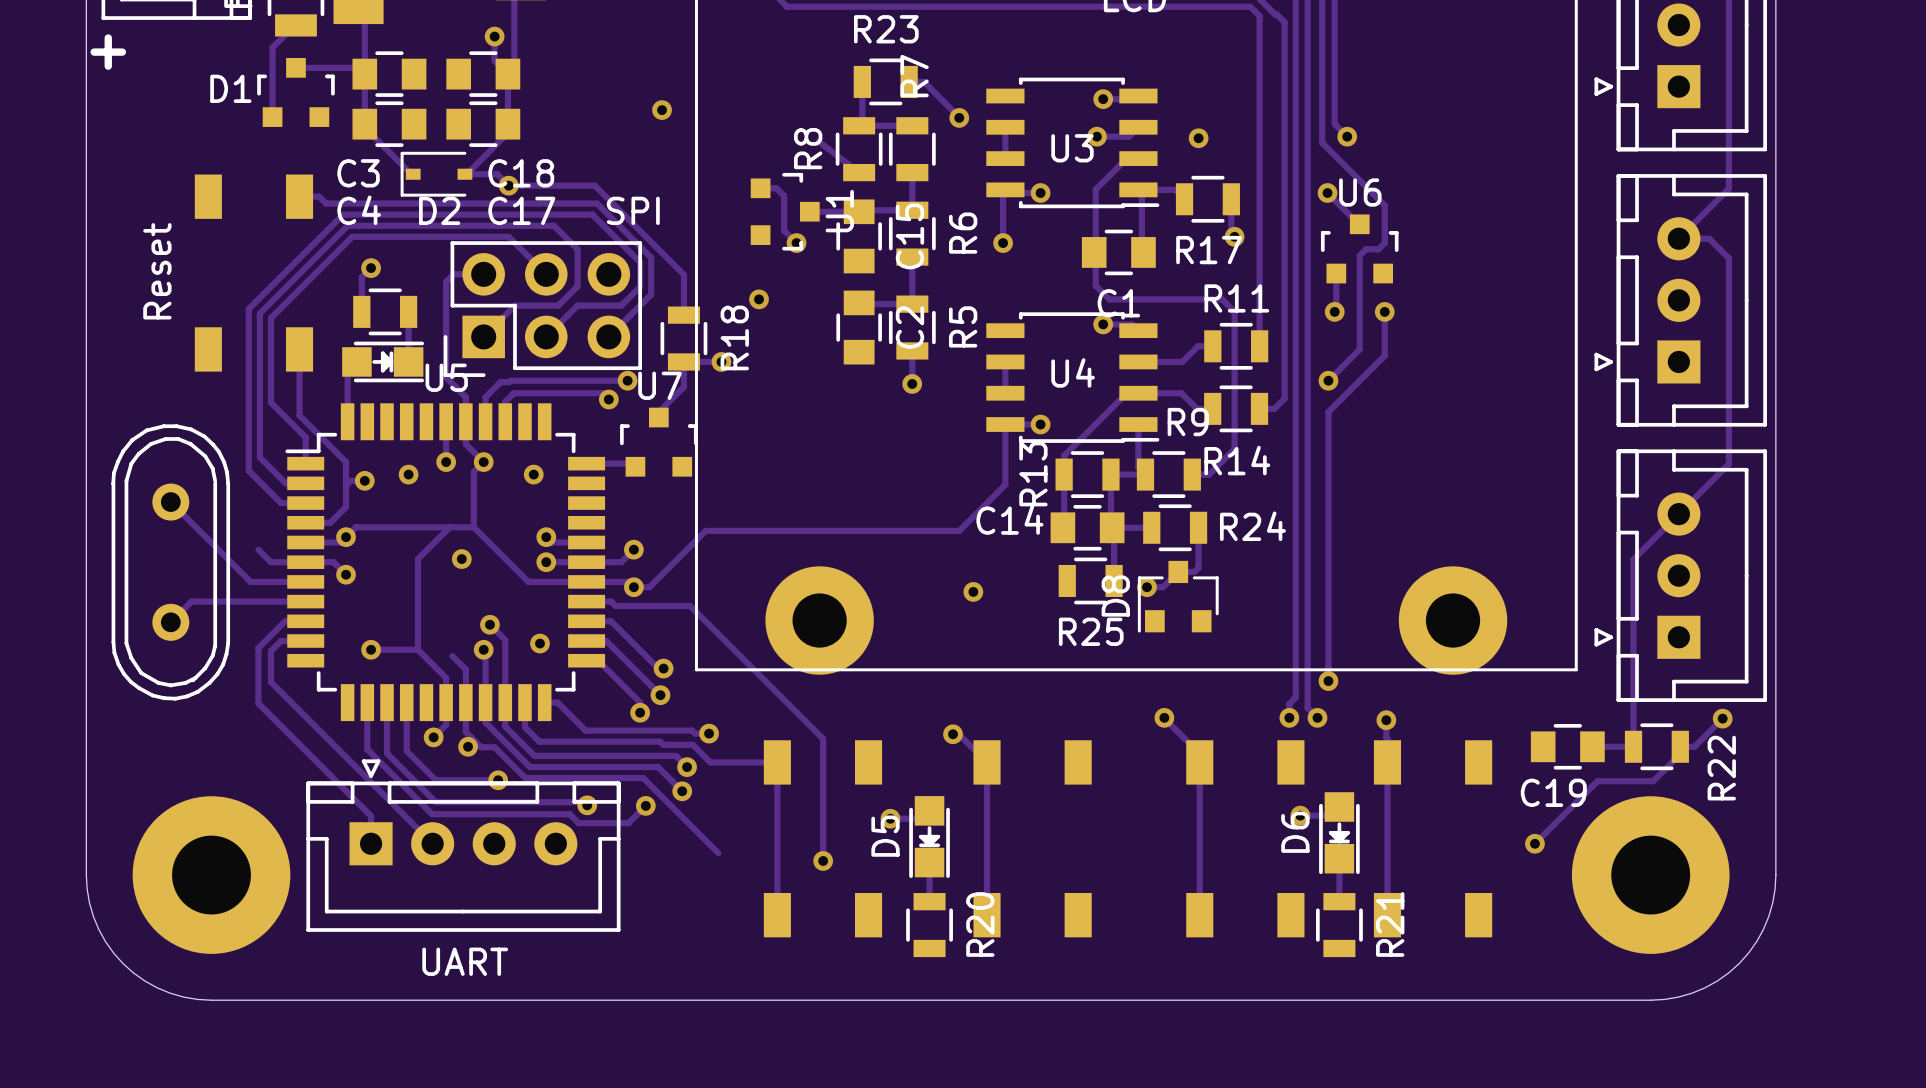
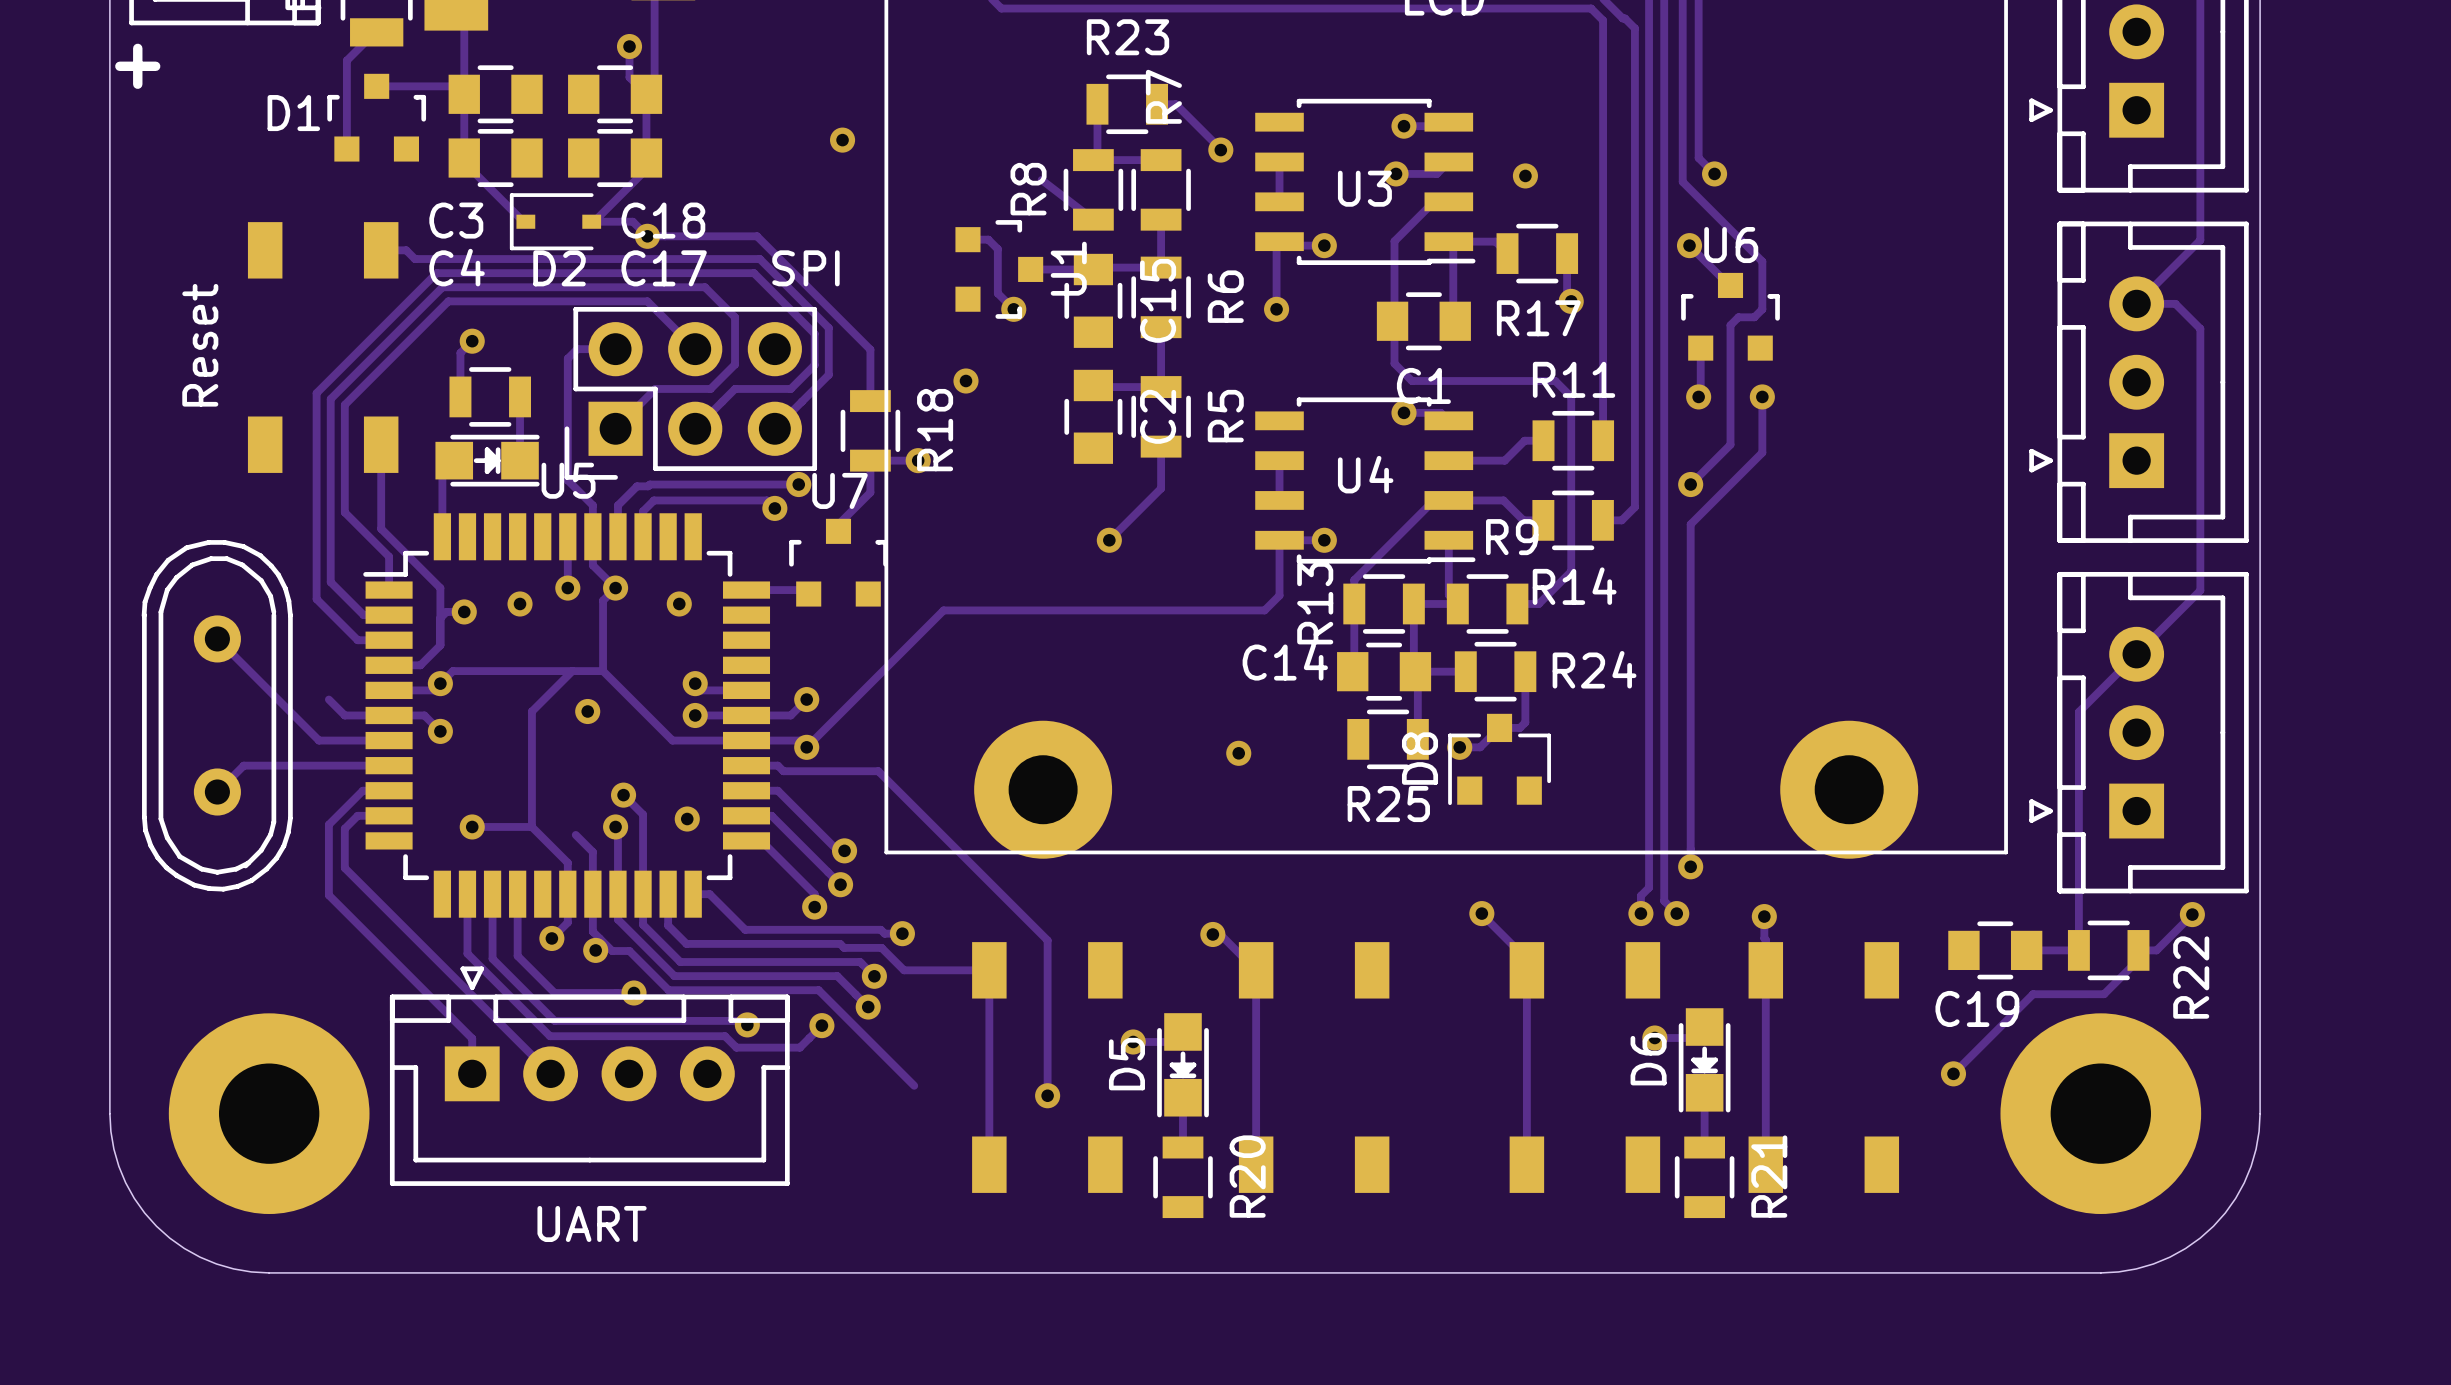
track: none -> (1160, 488) (1109, 540)
via position: (912, 383) -> (1109, 540)
track: (1005, 467) (1005, 484) (959, 530) (705, 530) (649, 587) (633, 587) -> (1279, 595) (1264, 610) (943, 610) (806, 747)

